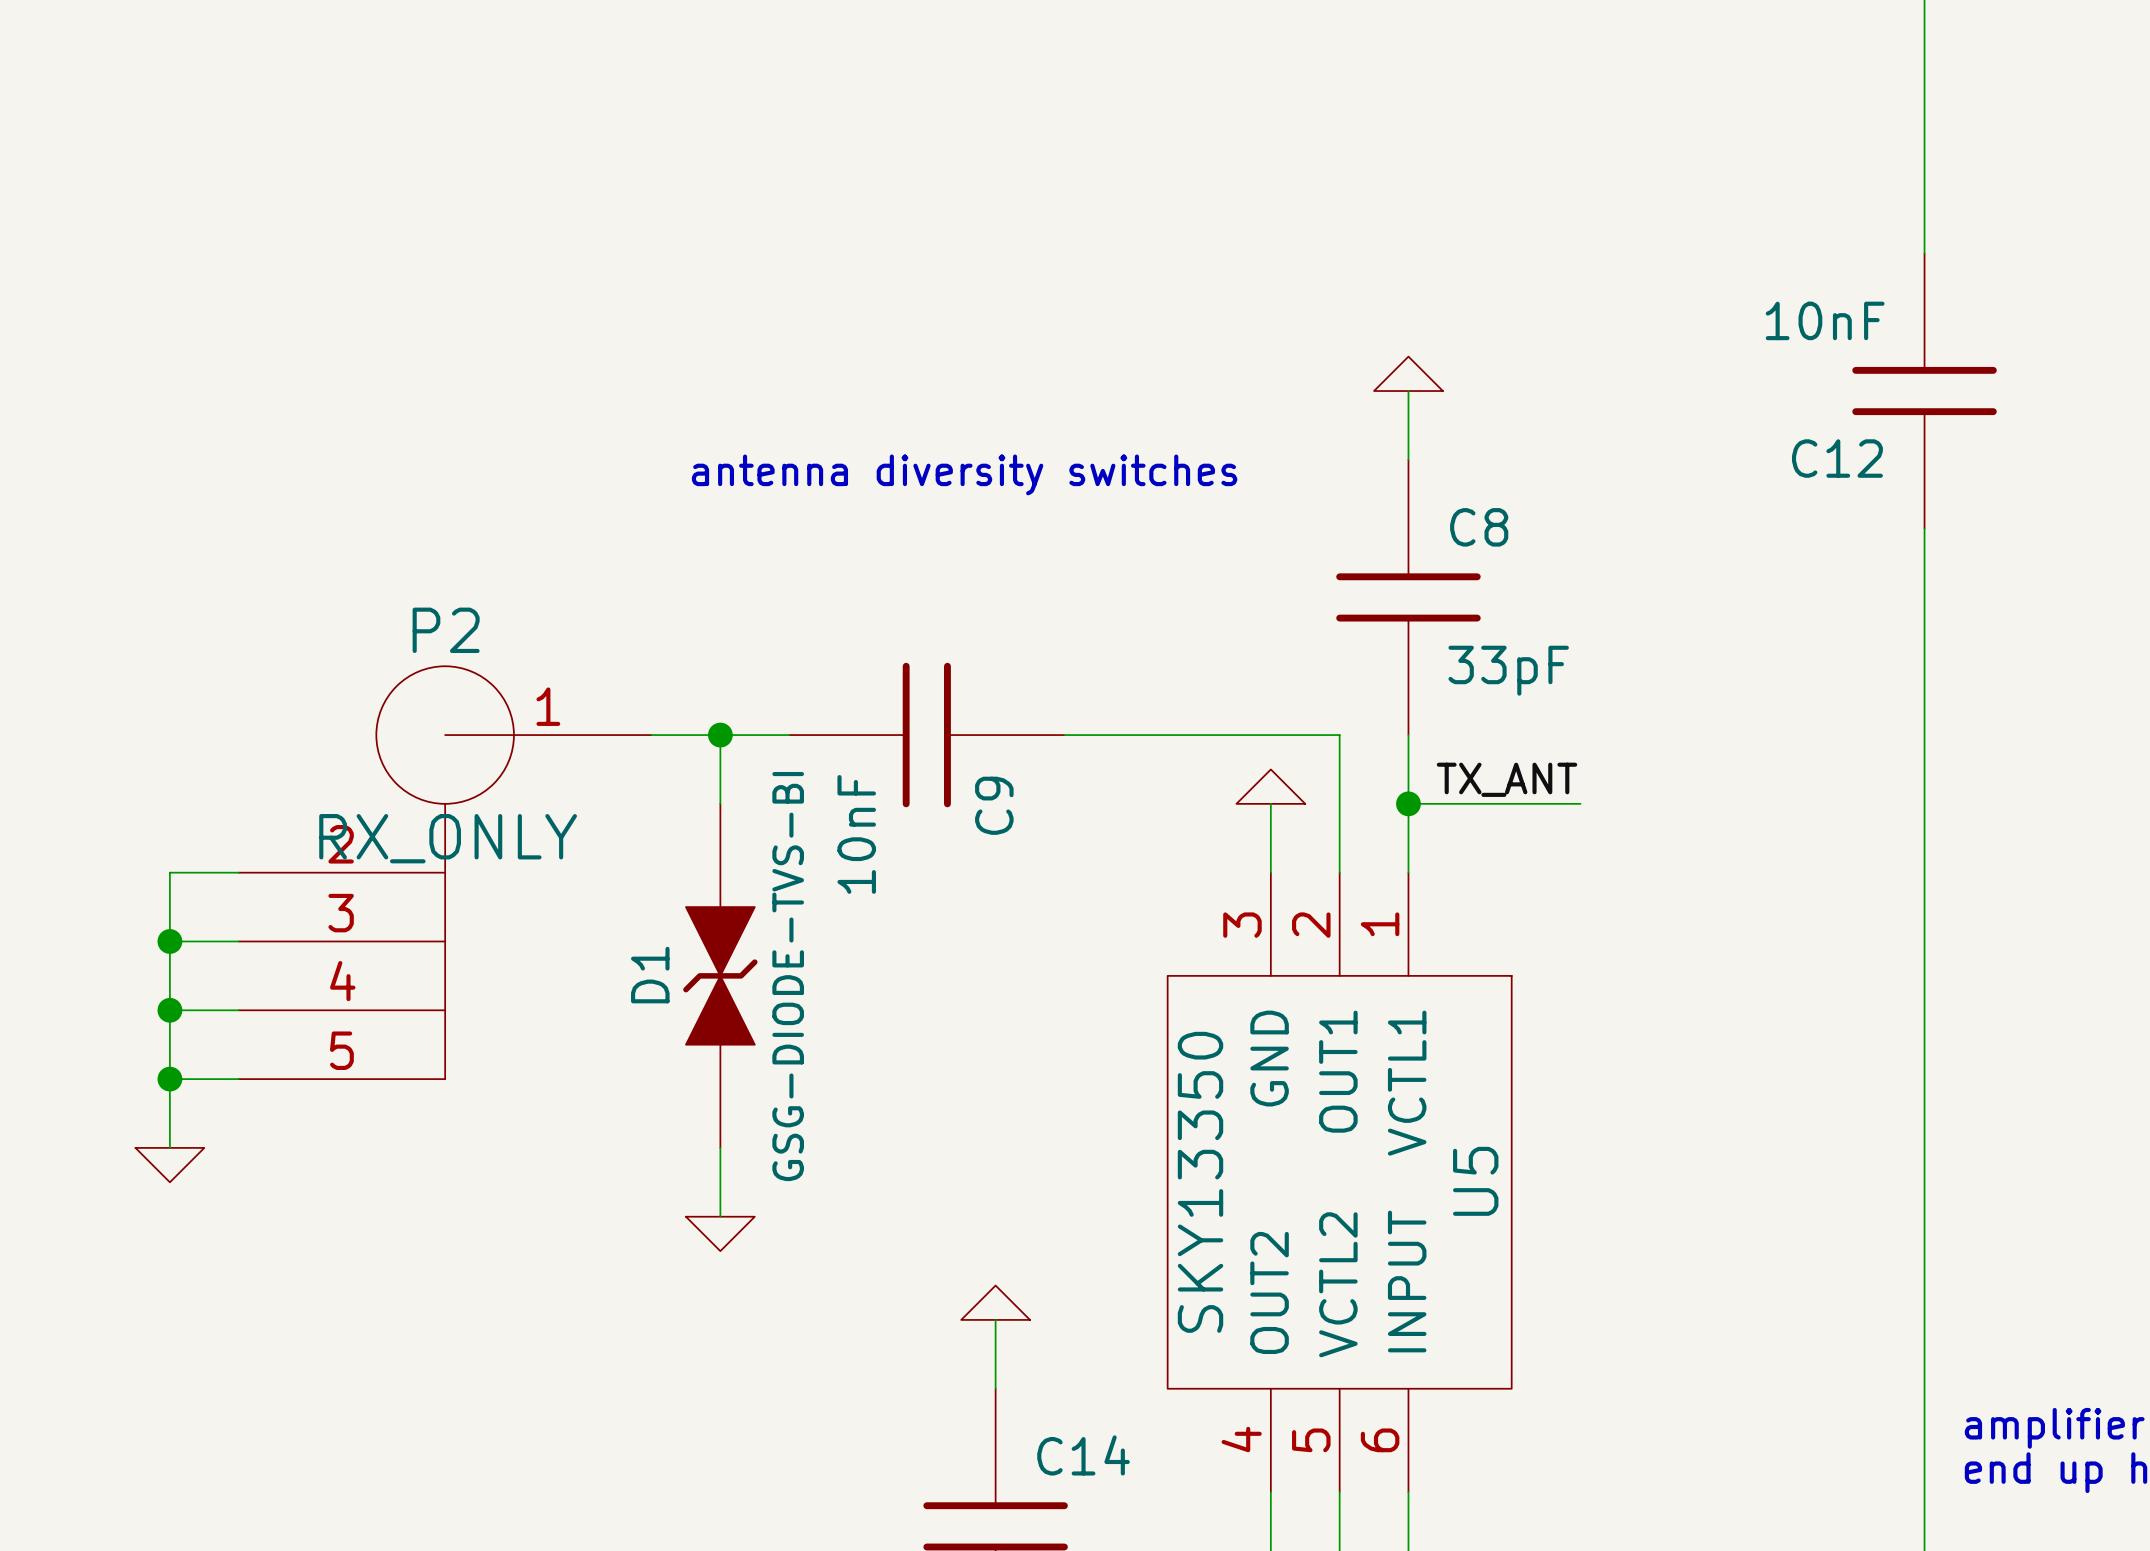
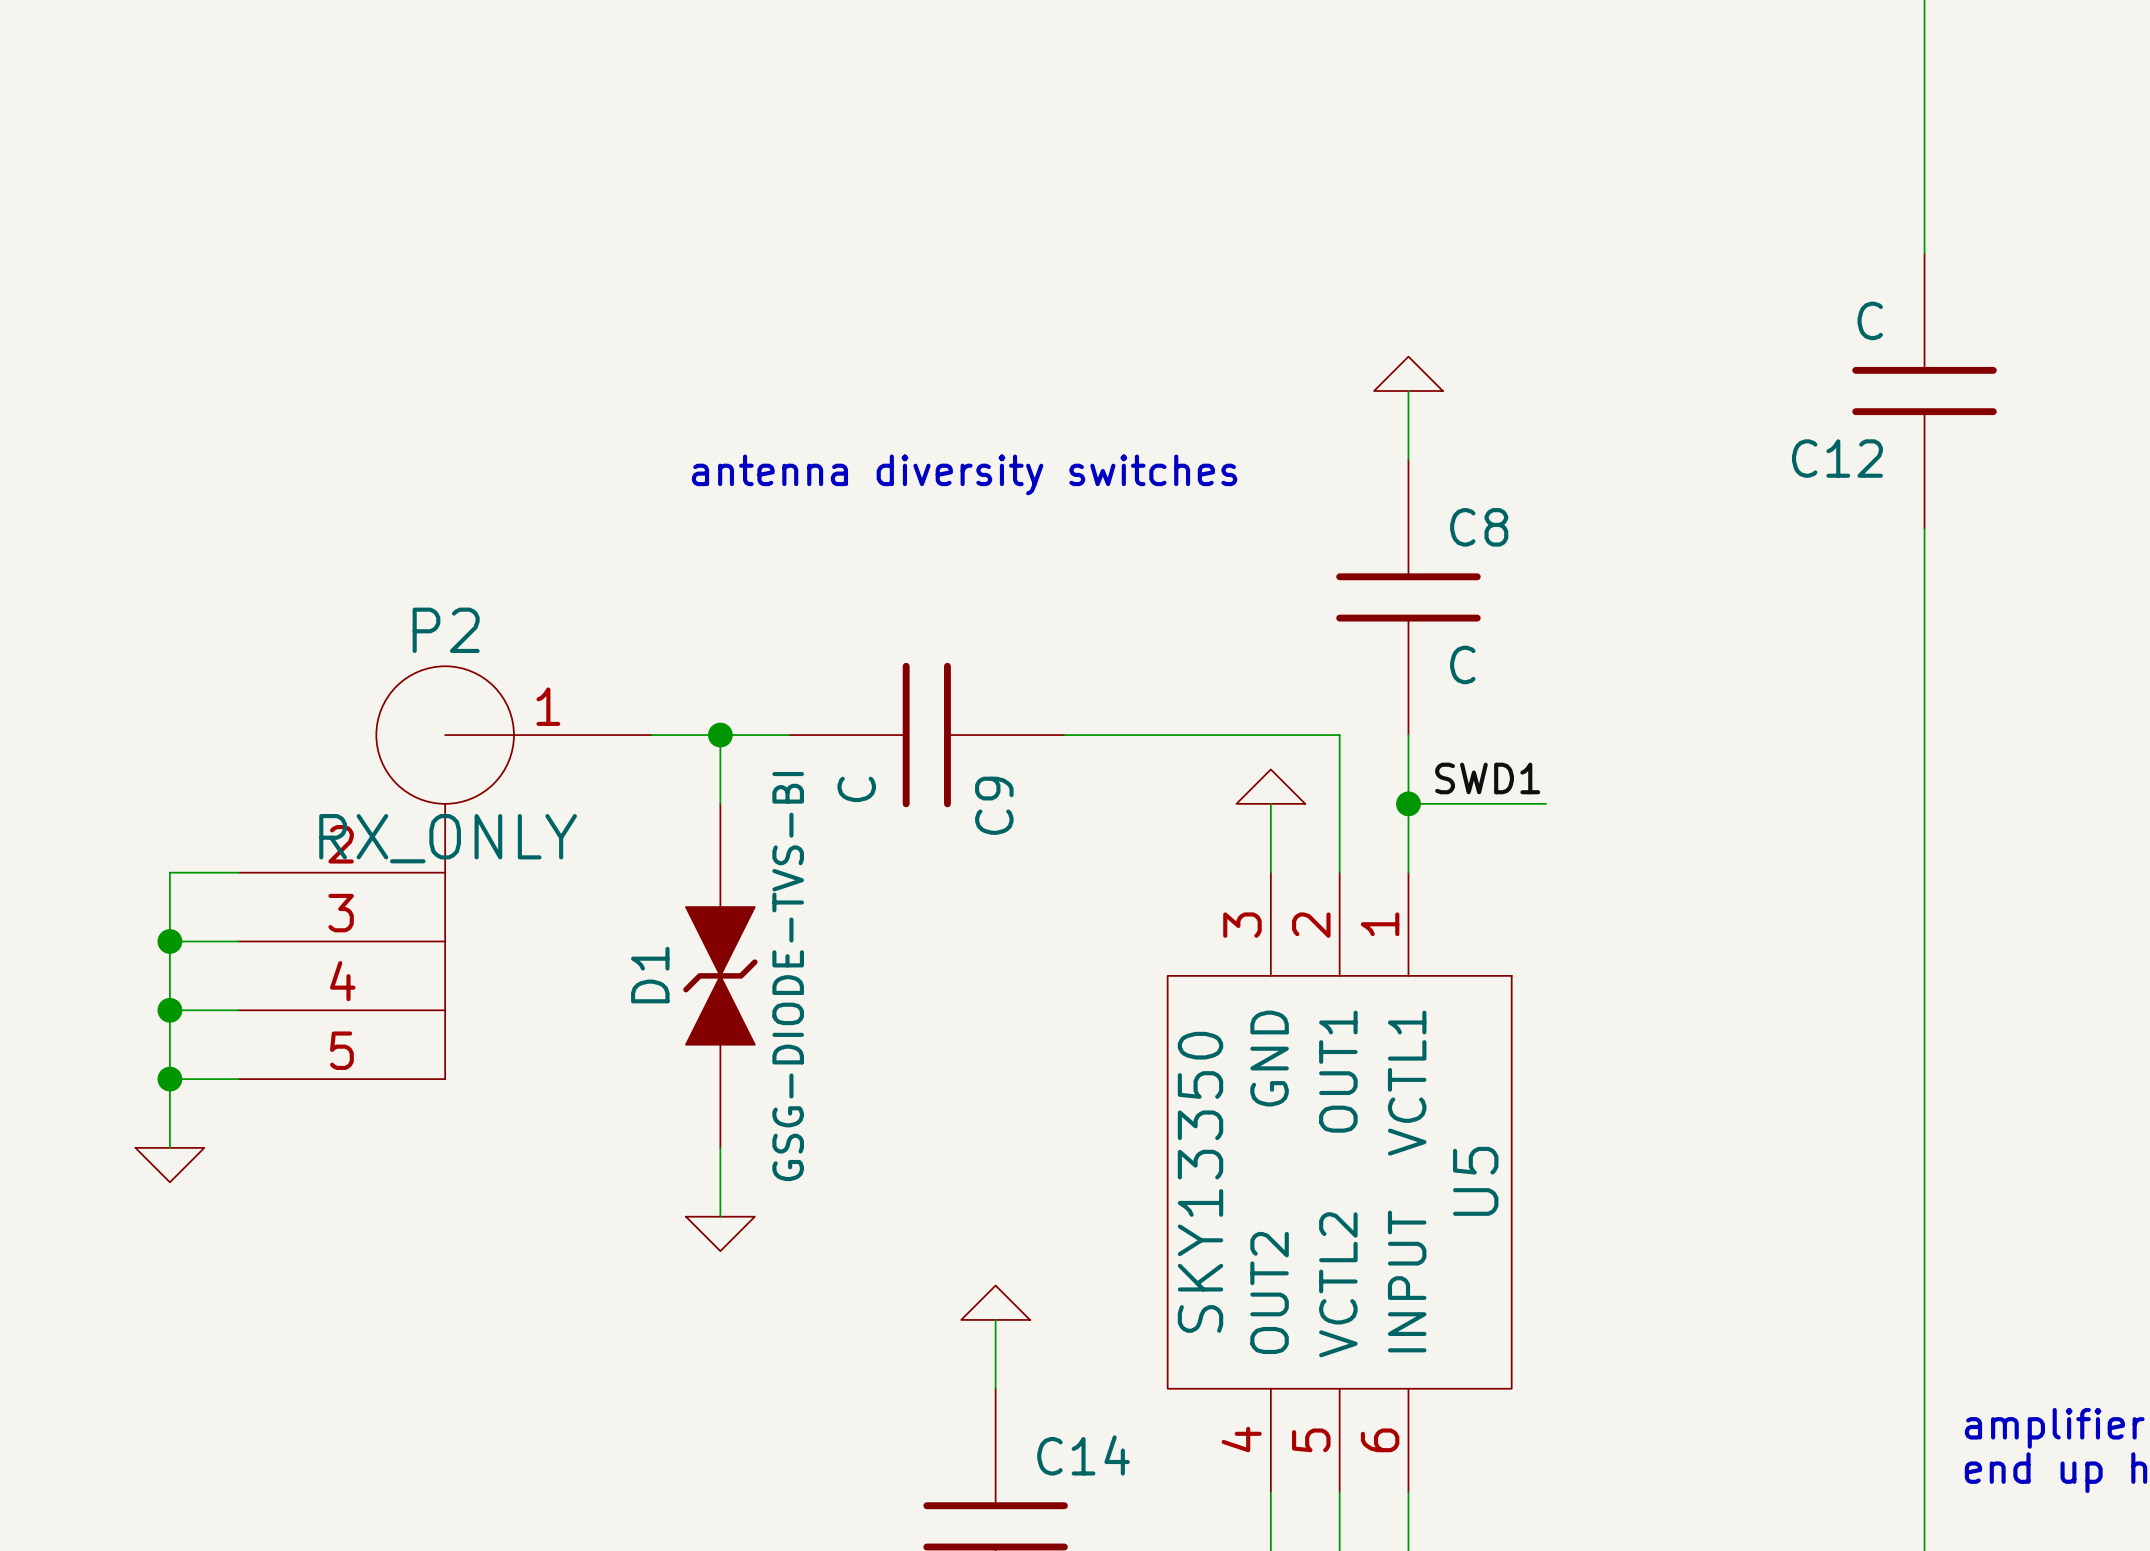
C12 value: 10nF (1825, 320) -> C (1870, 320)
C8 value: 33pF (1508, 670) -> C (1462, 664)
label: none -> SWD1 (1487, 778)
label: TX_ANT (1507, 779) -> none
wire: (1546, 803) (1580, 803) -> none
C9 value: 10nF (856, 834) -> C (856, 789)

